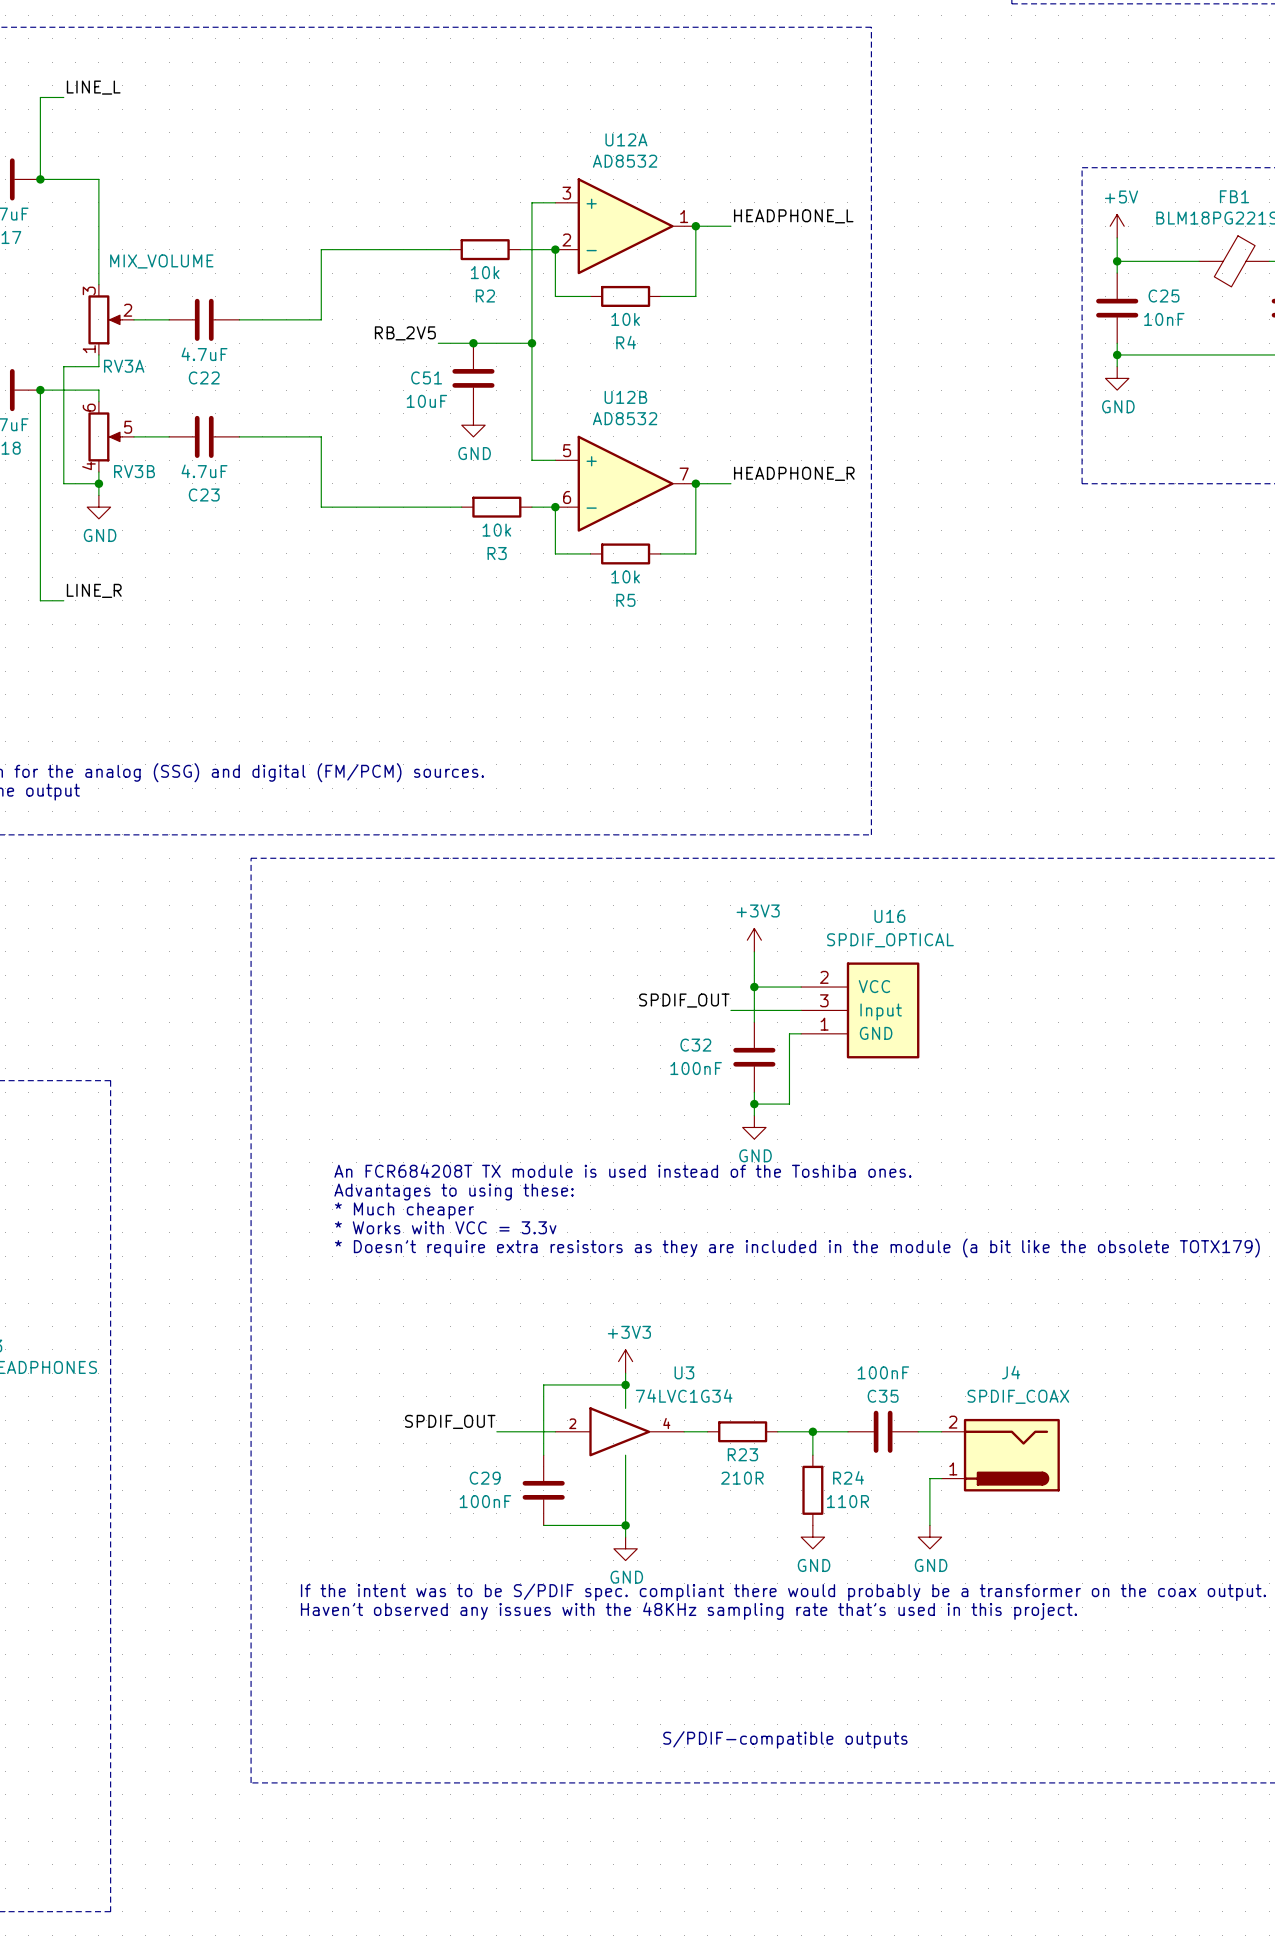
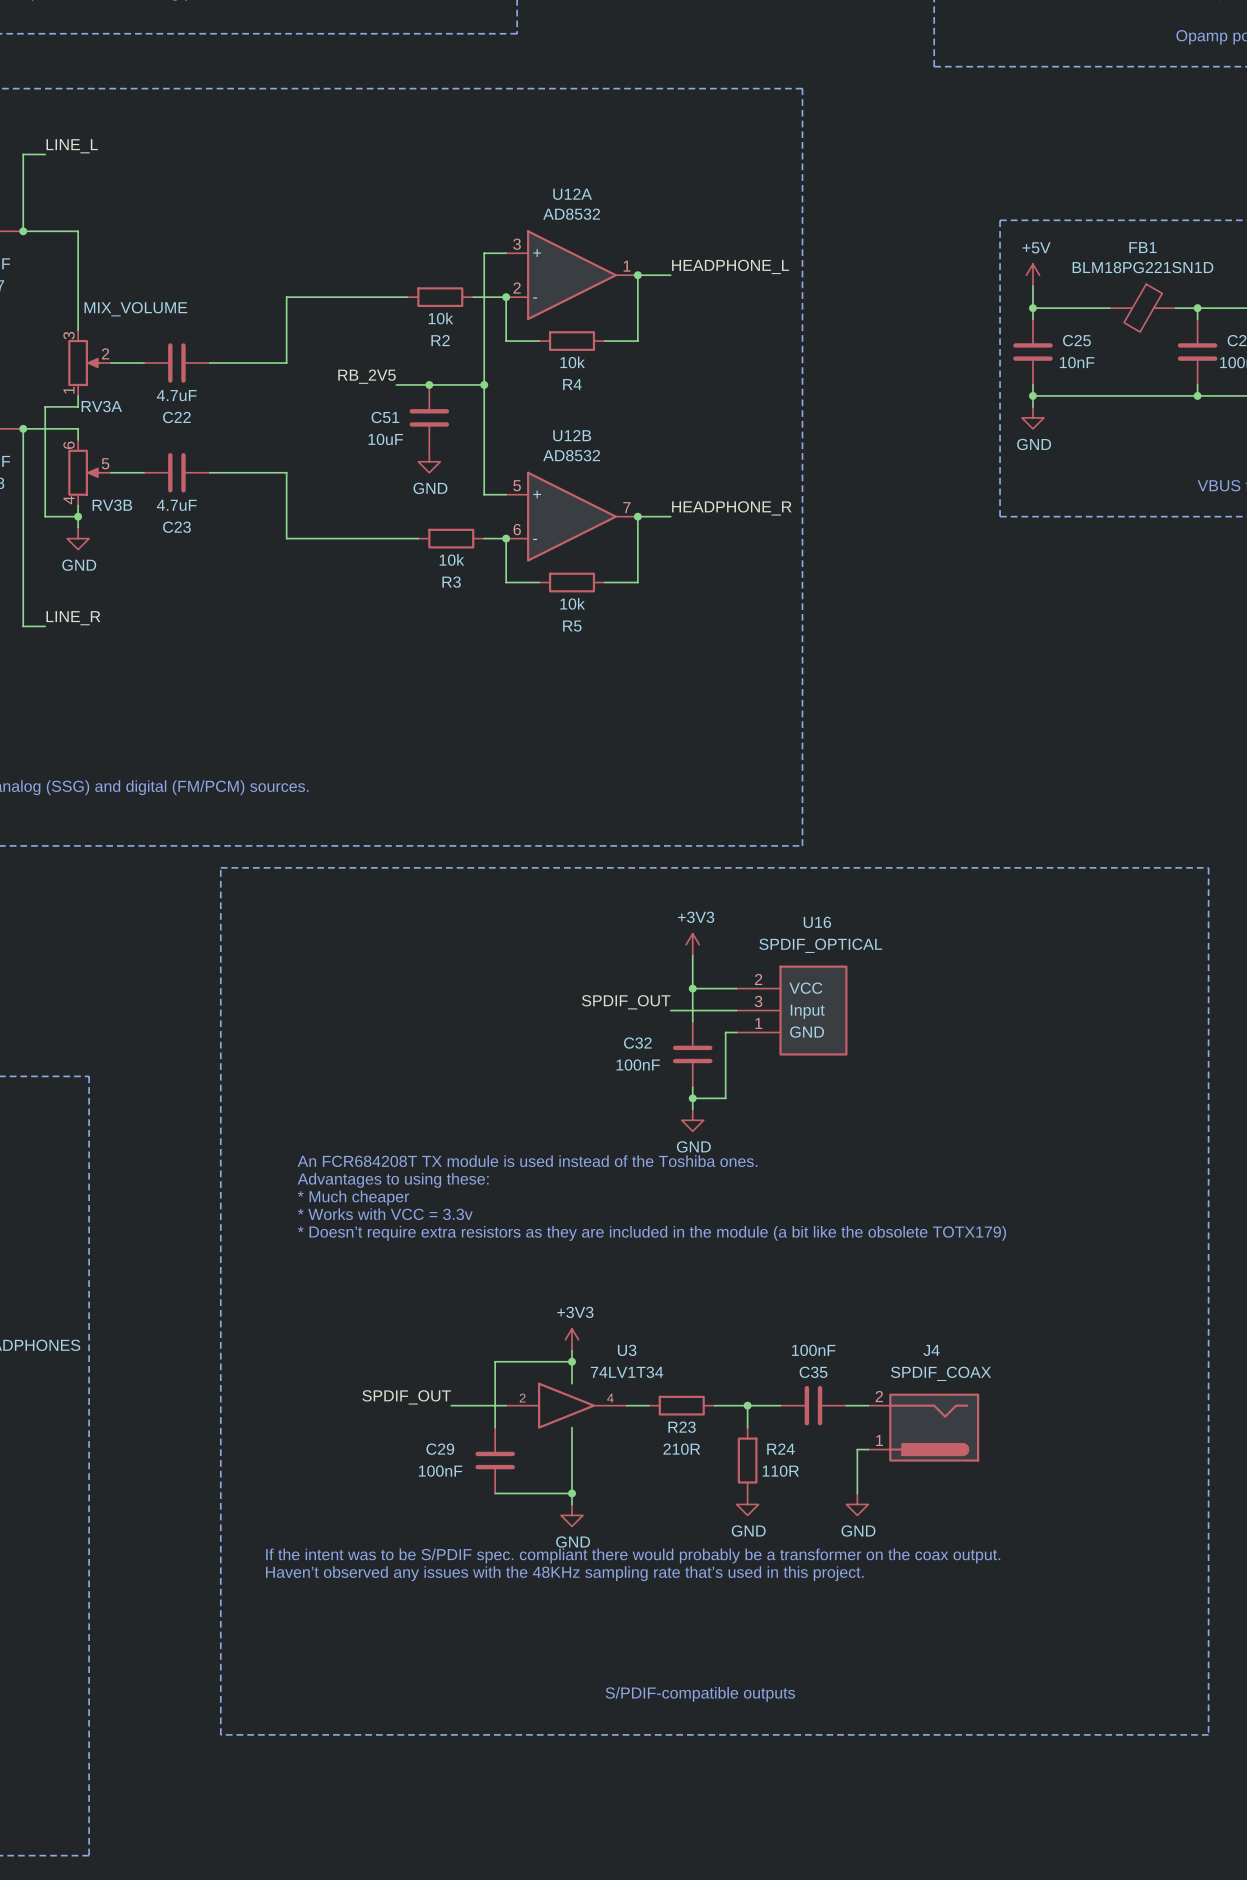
U3 value: 74LVC1G34 (684, 1395) -> 74LV1T34 (627, 1372)

